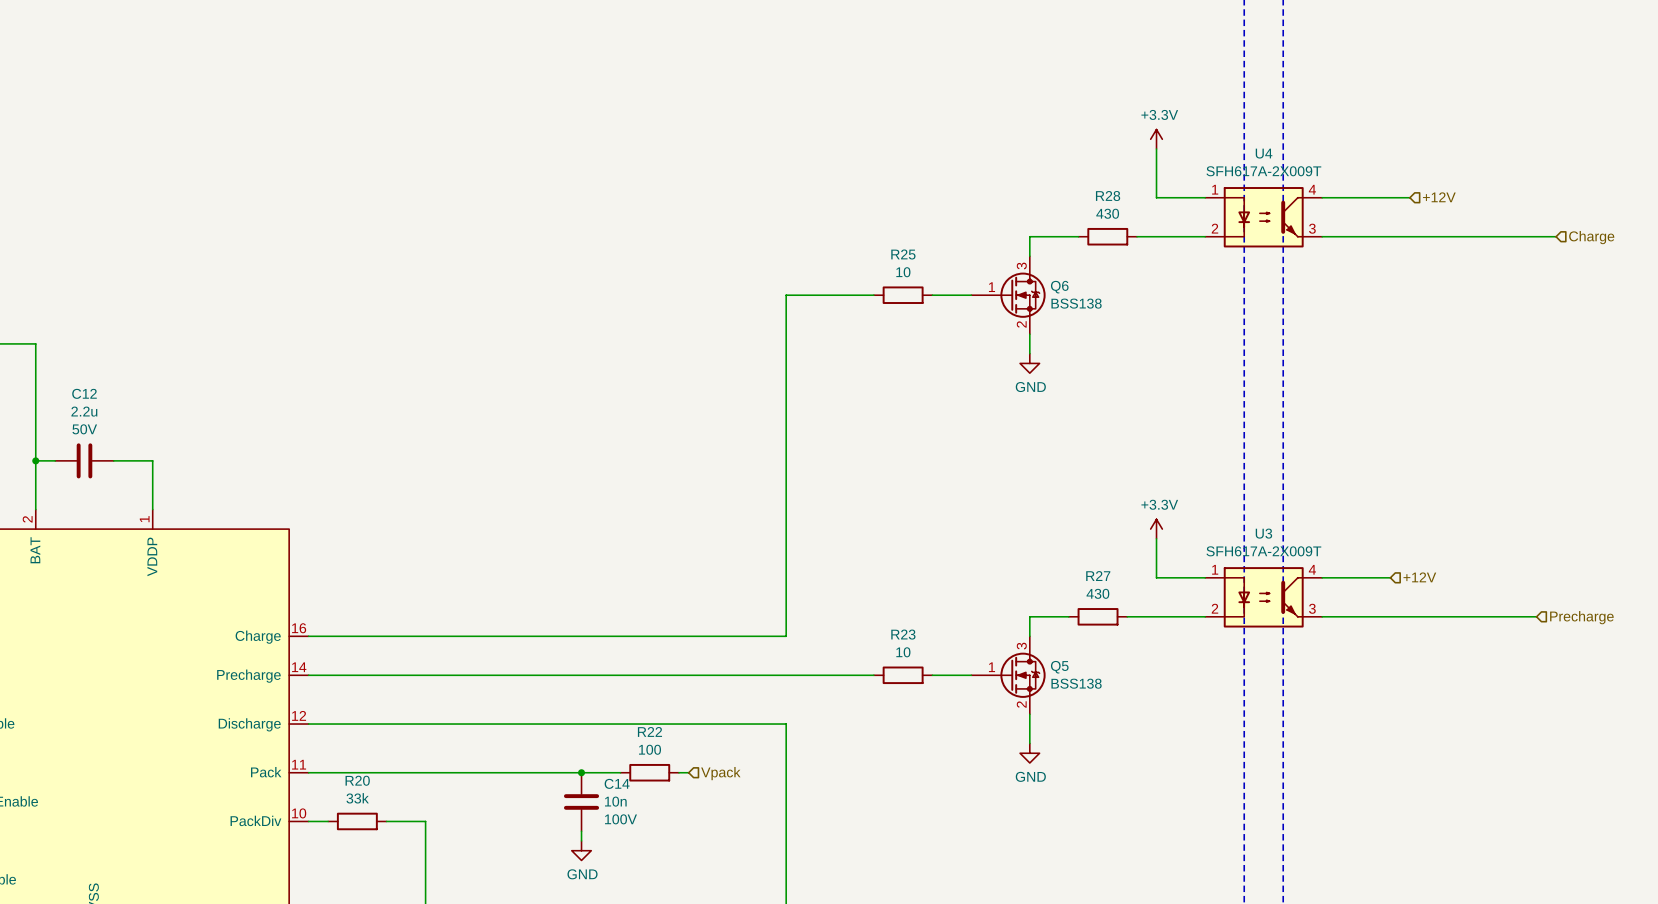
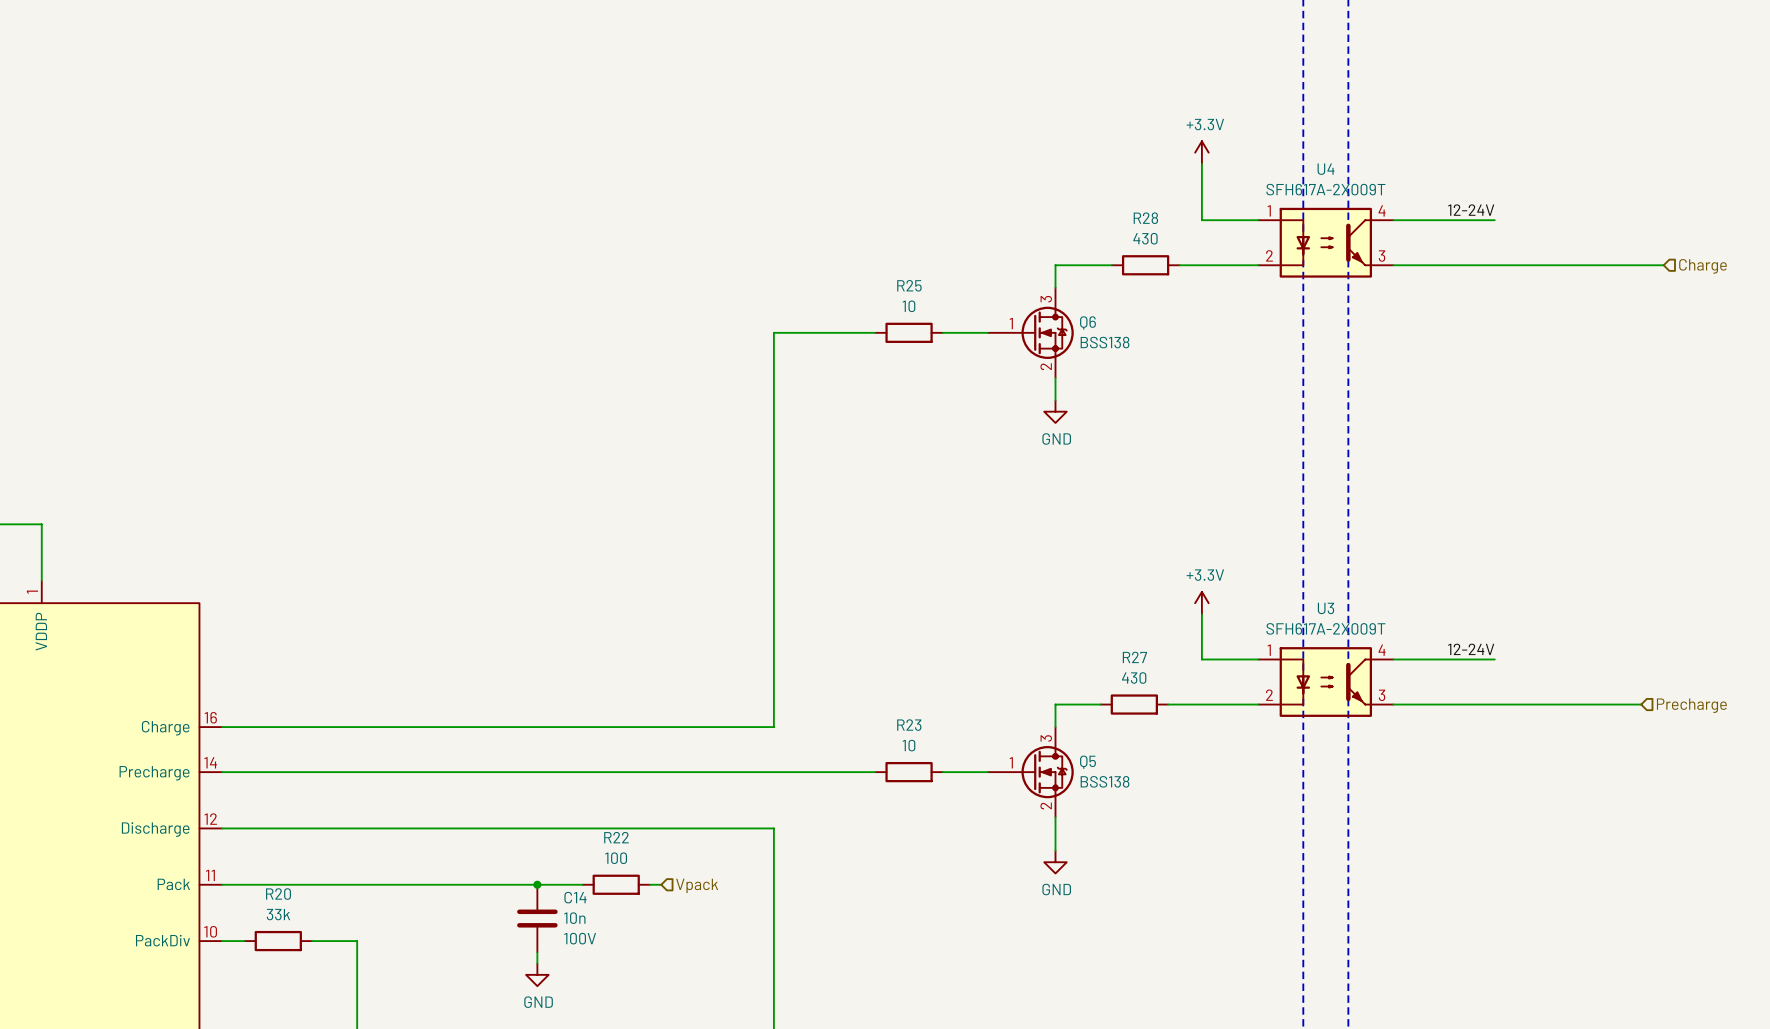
label: none -> 12-24V (1471, 210)
hierarchical label: +12V (1439, 197) -> none
label: none -> 12-24V (1471, 649)
wire: none -> (1472, 659) (1494, 659)
hierarchical label: +12V (1419, 577) -> none

